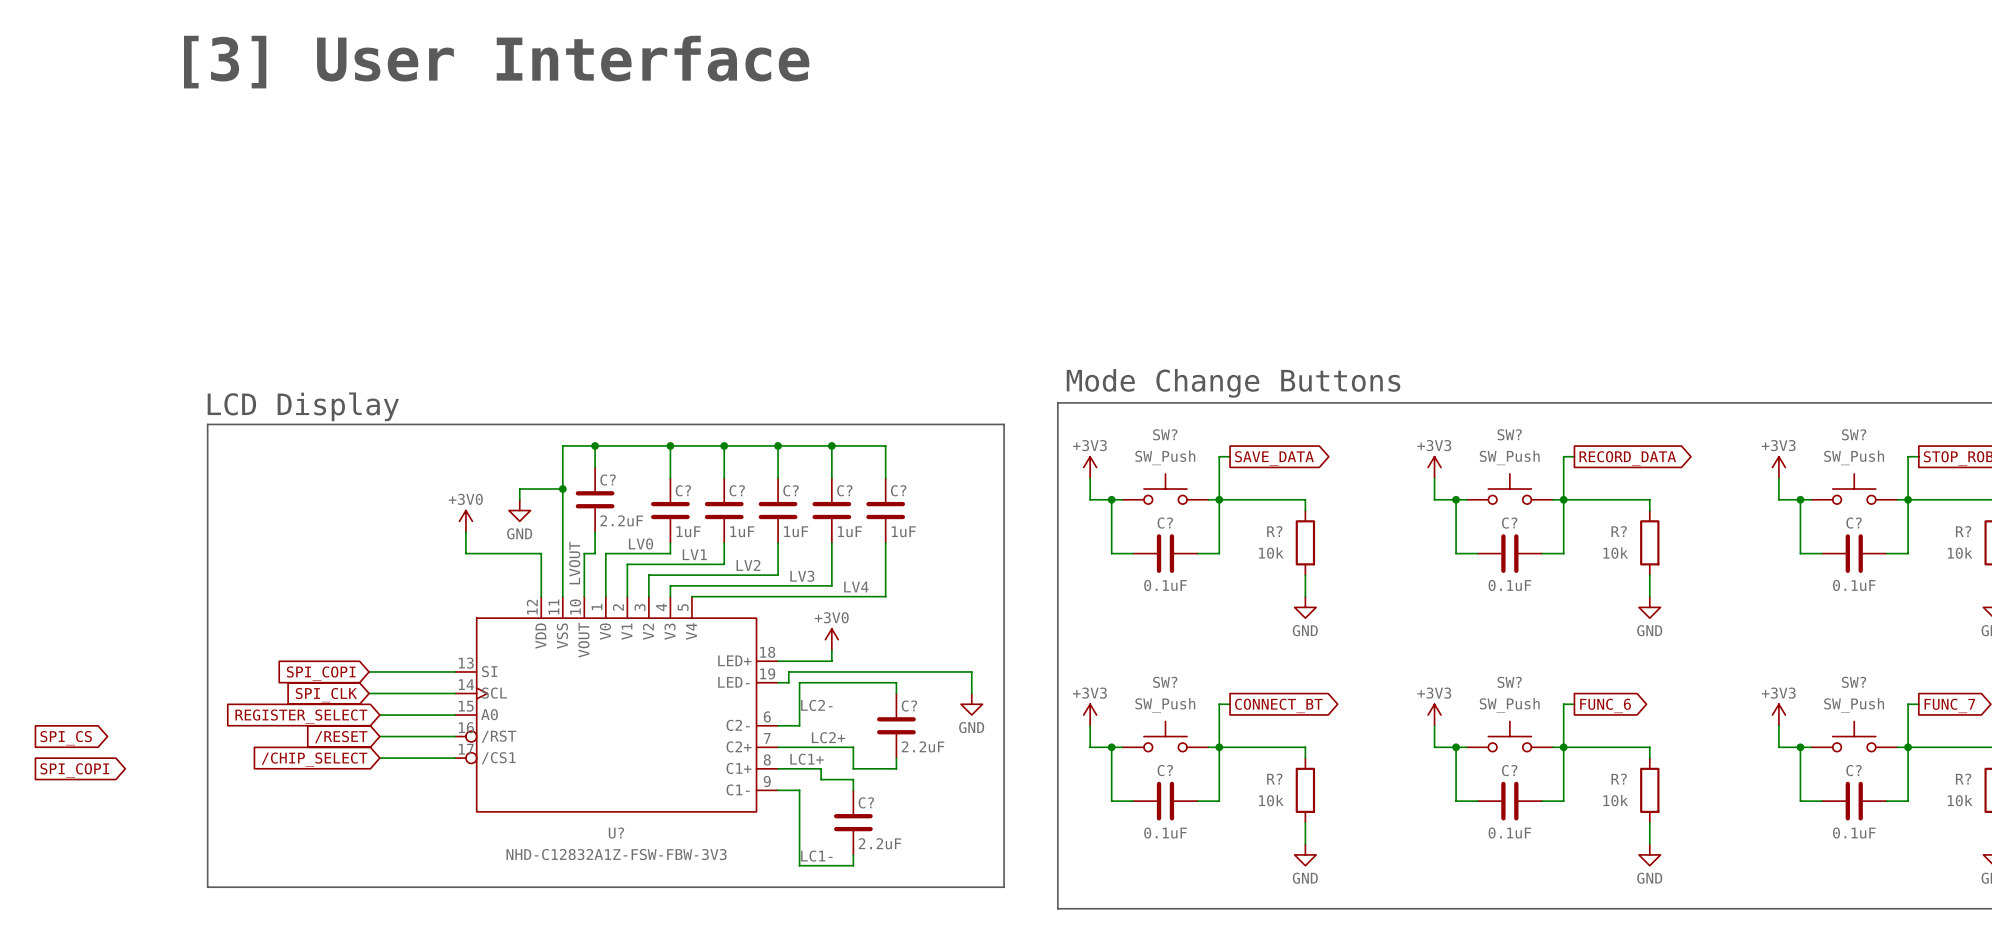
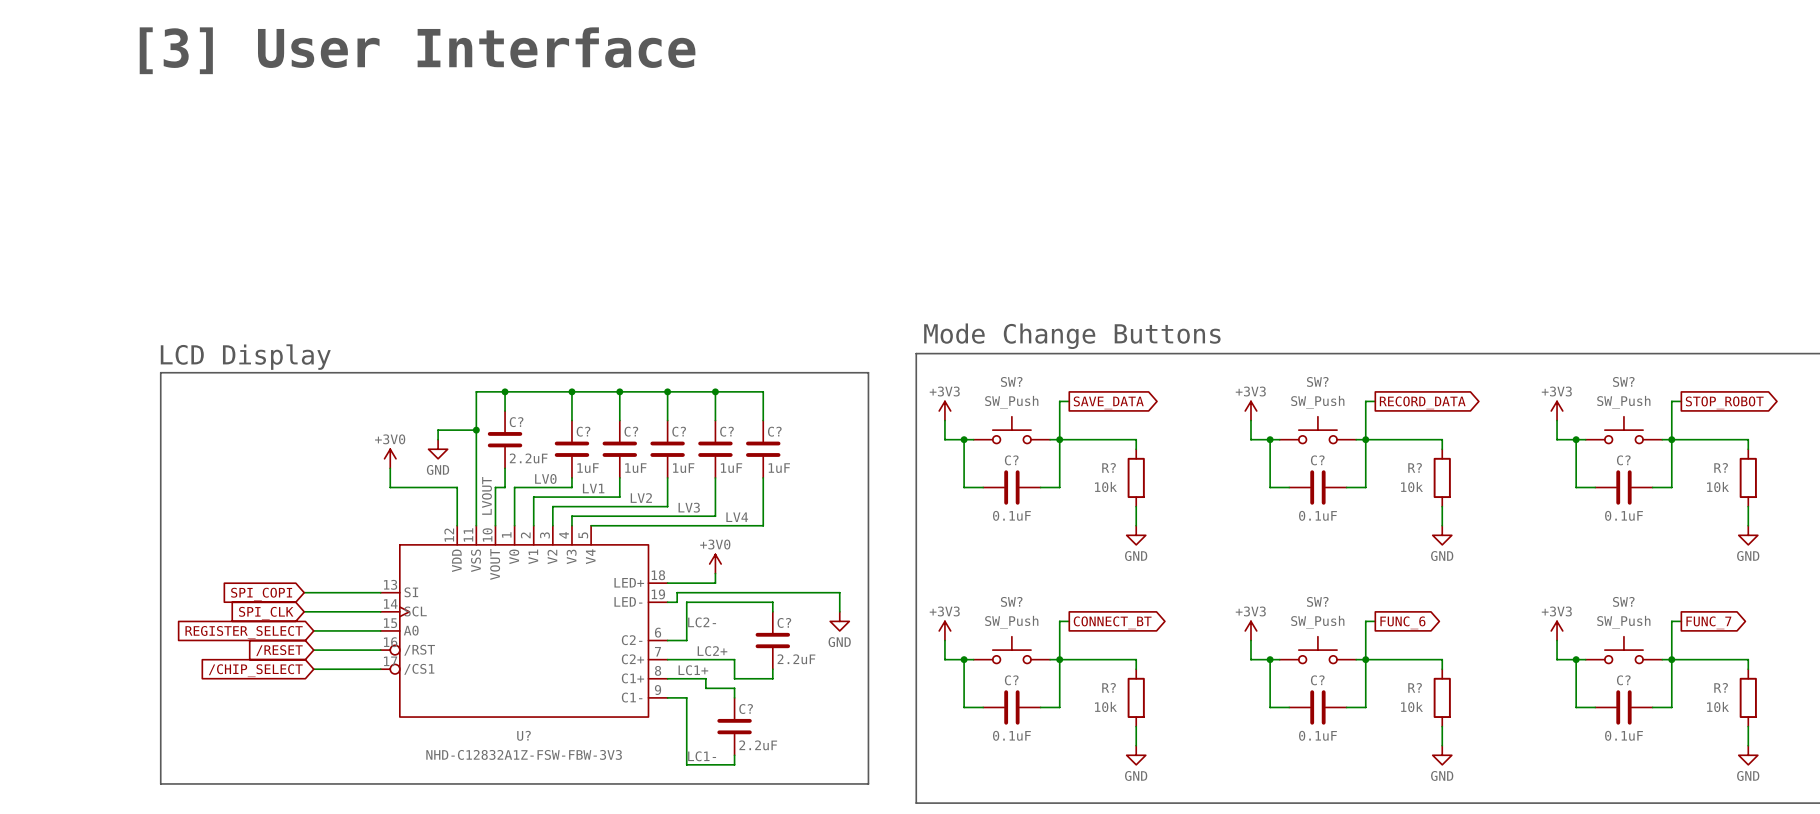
global label: SPI_CS (66, 738) -> none
global label: SPI_COPI (74, 770) -> none

